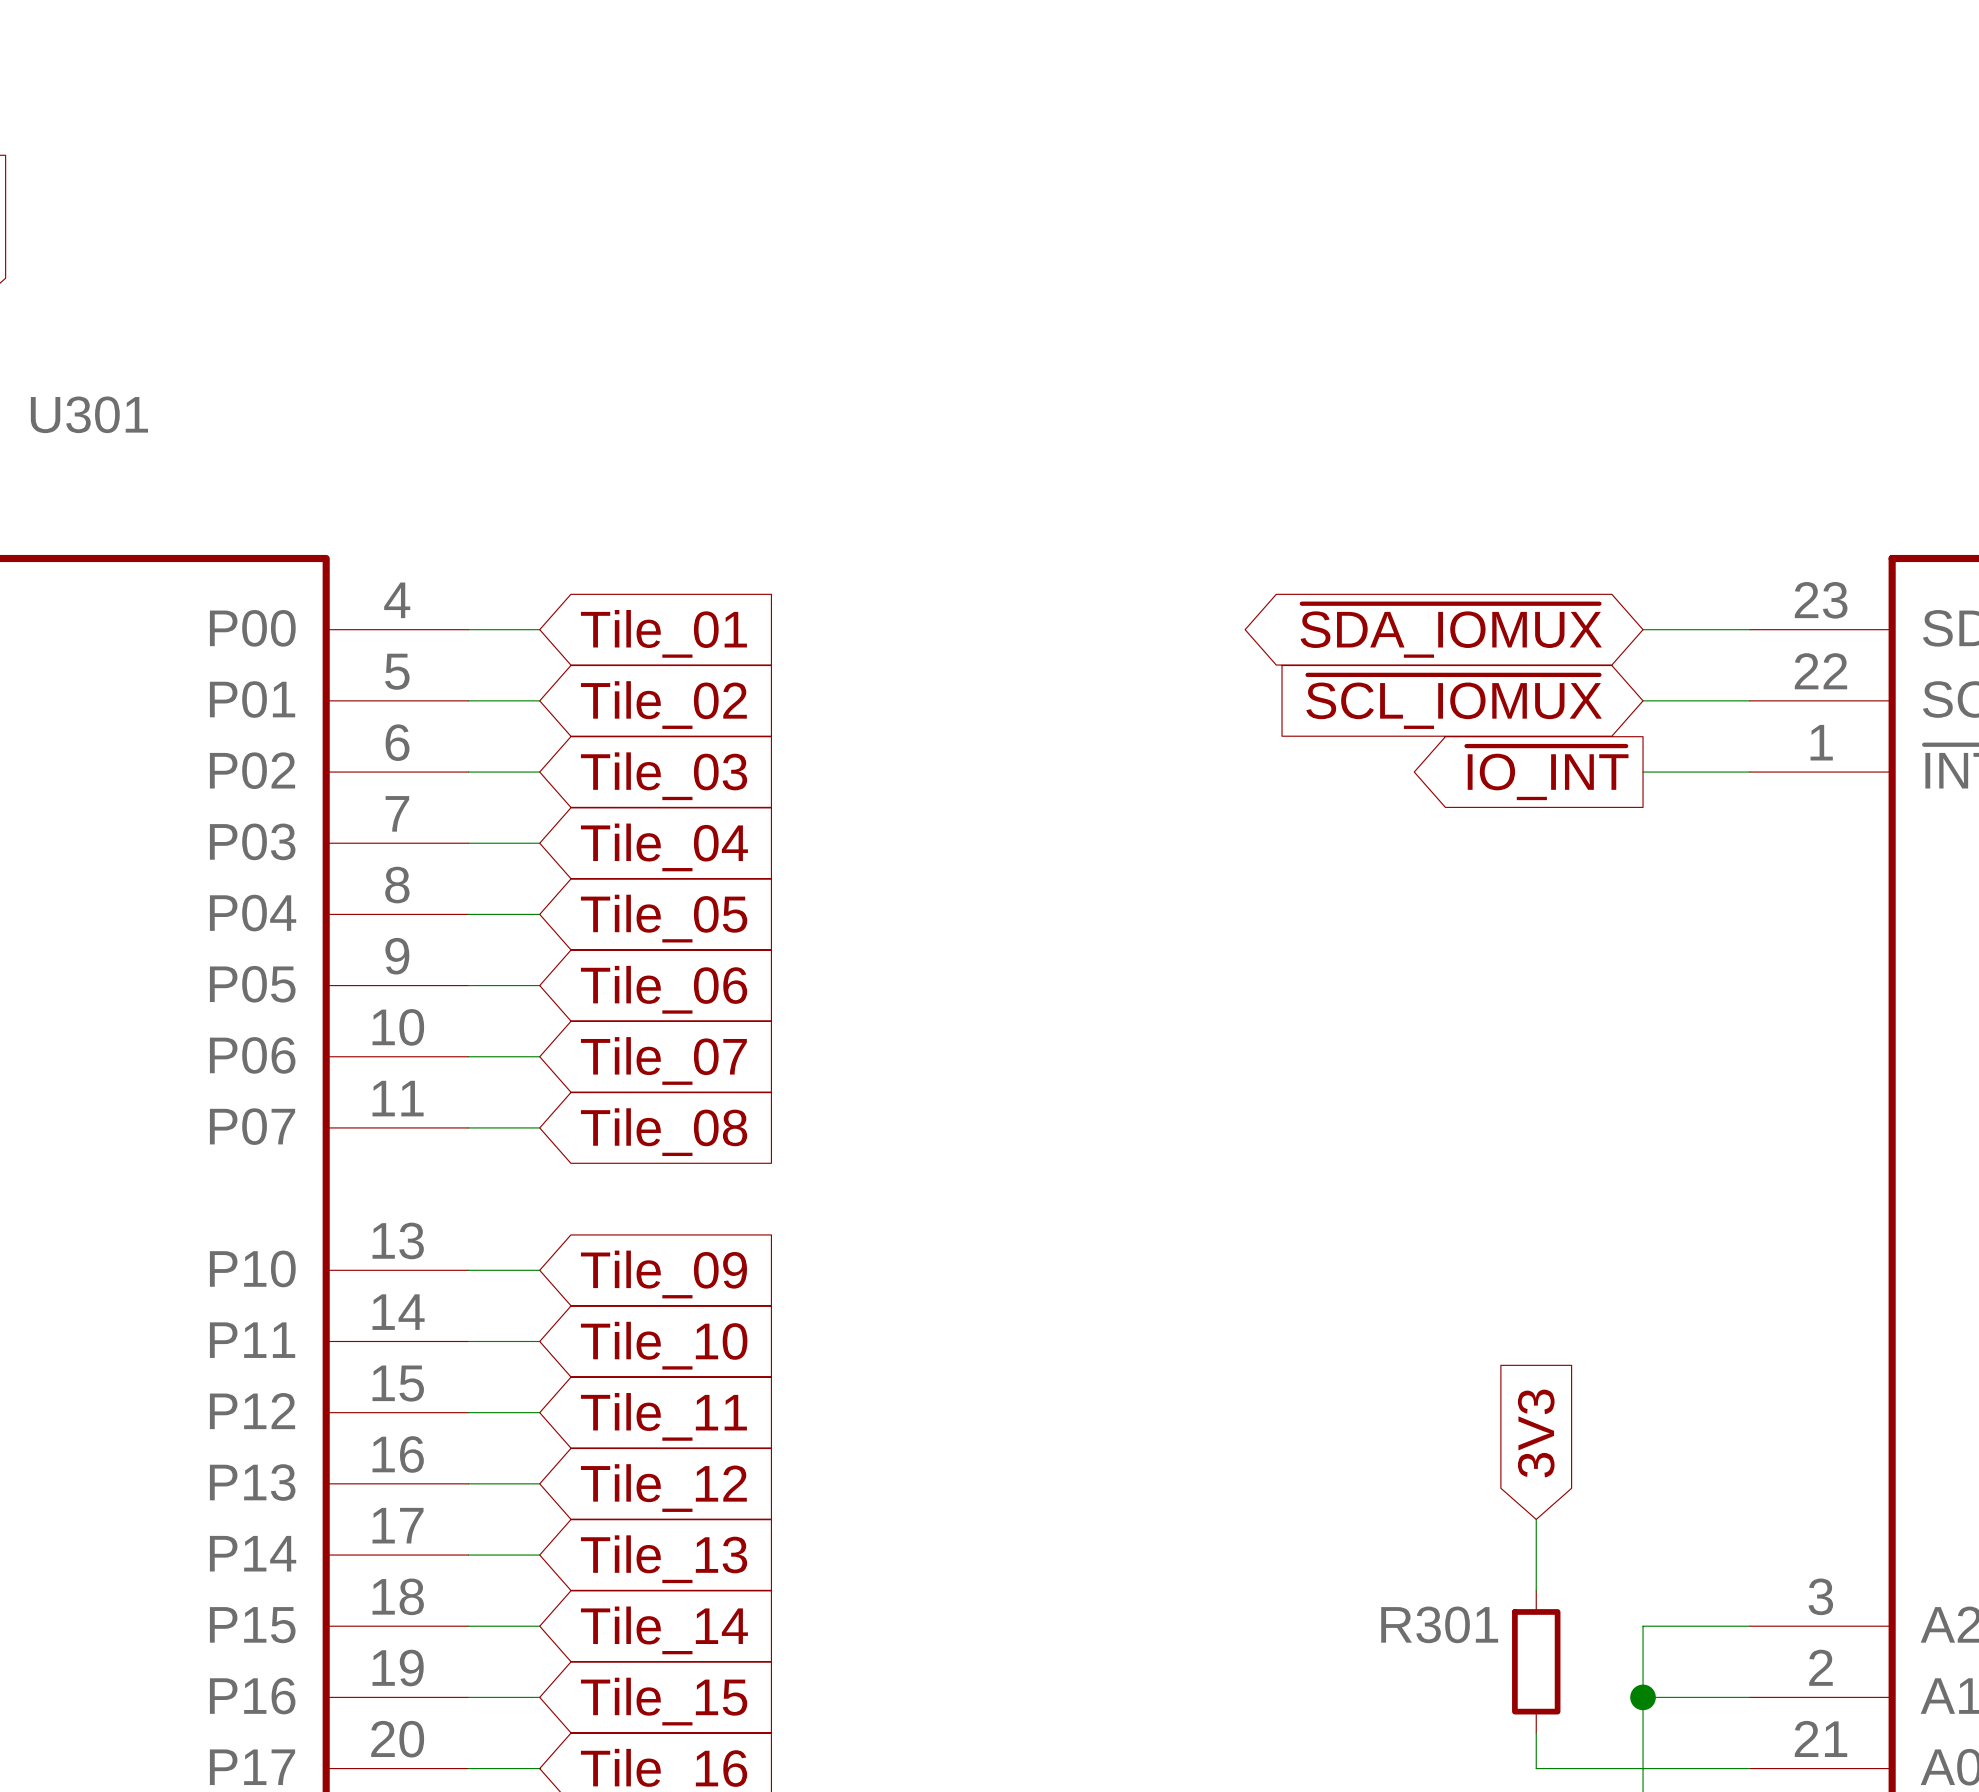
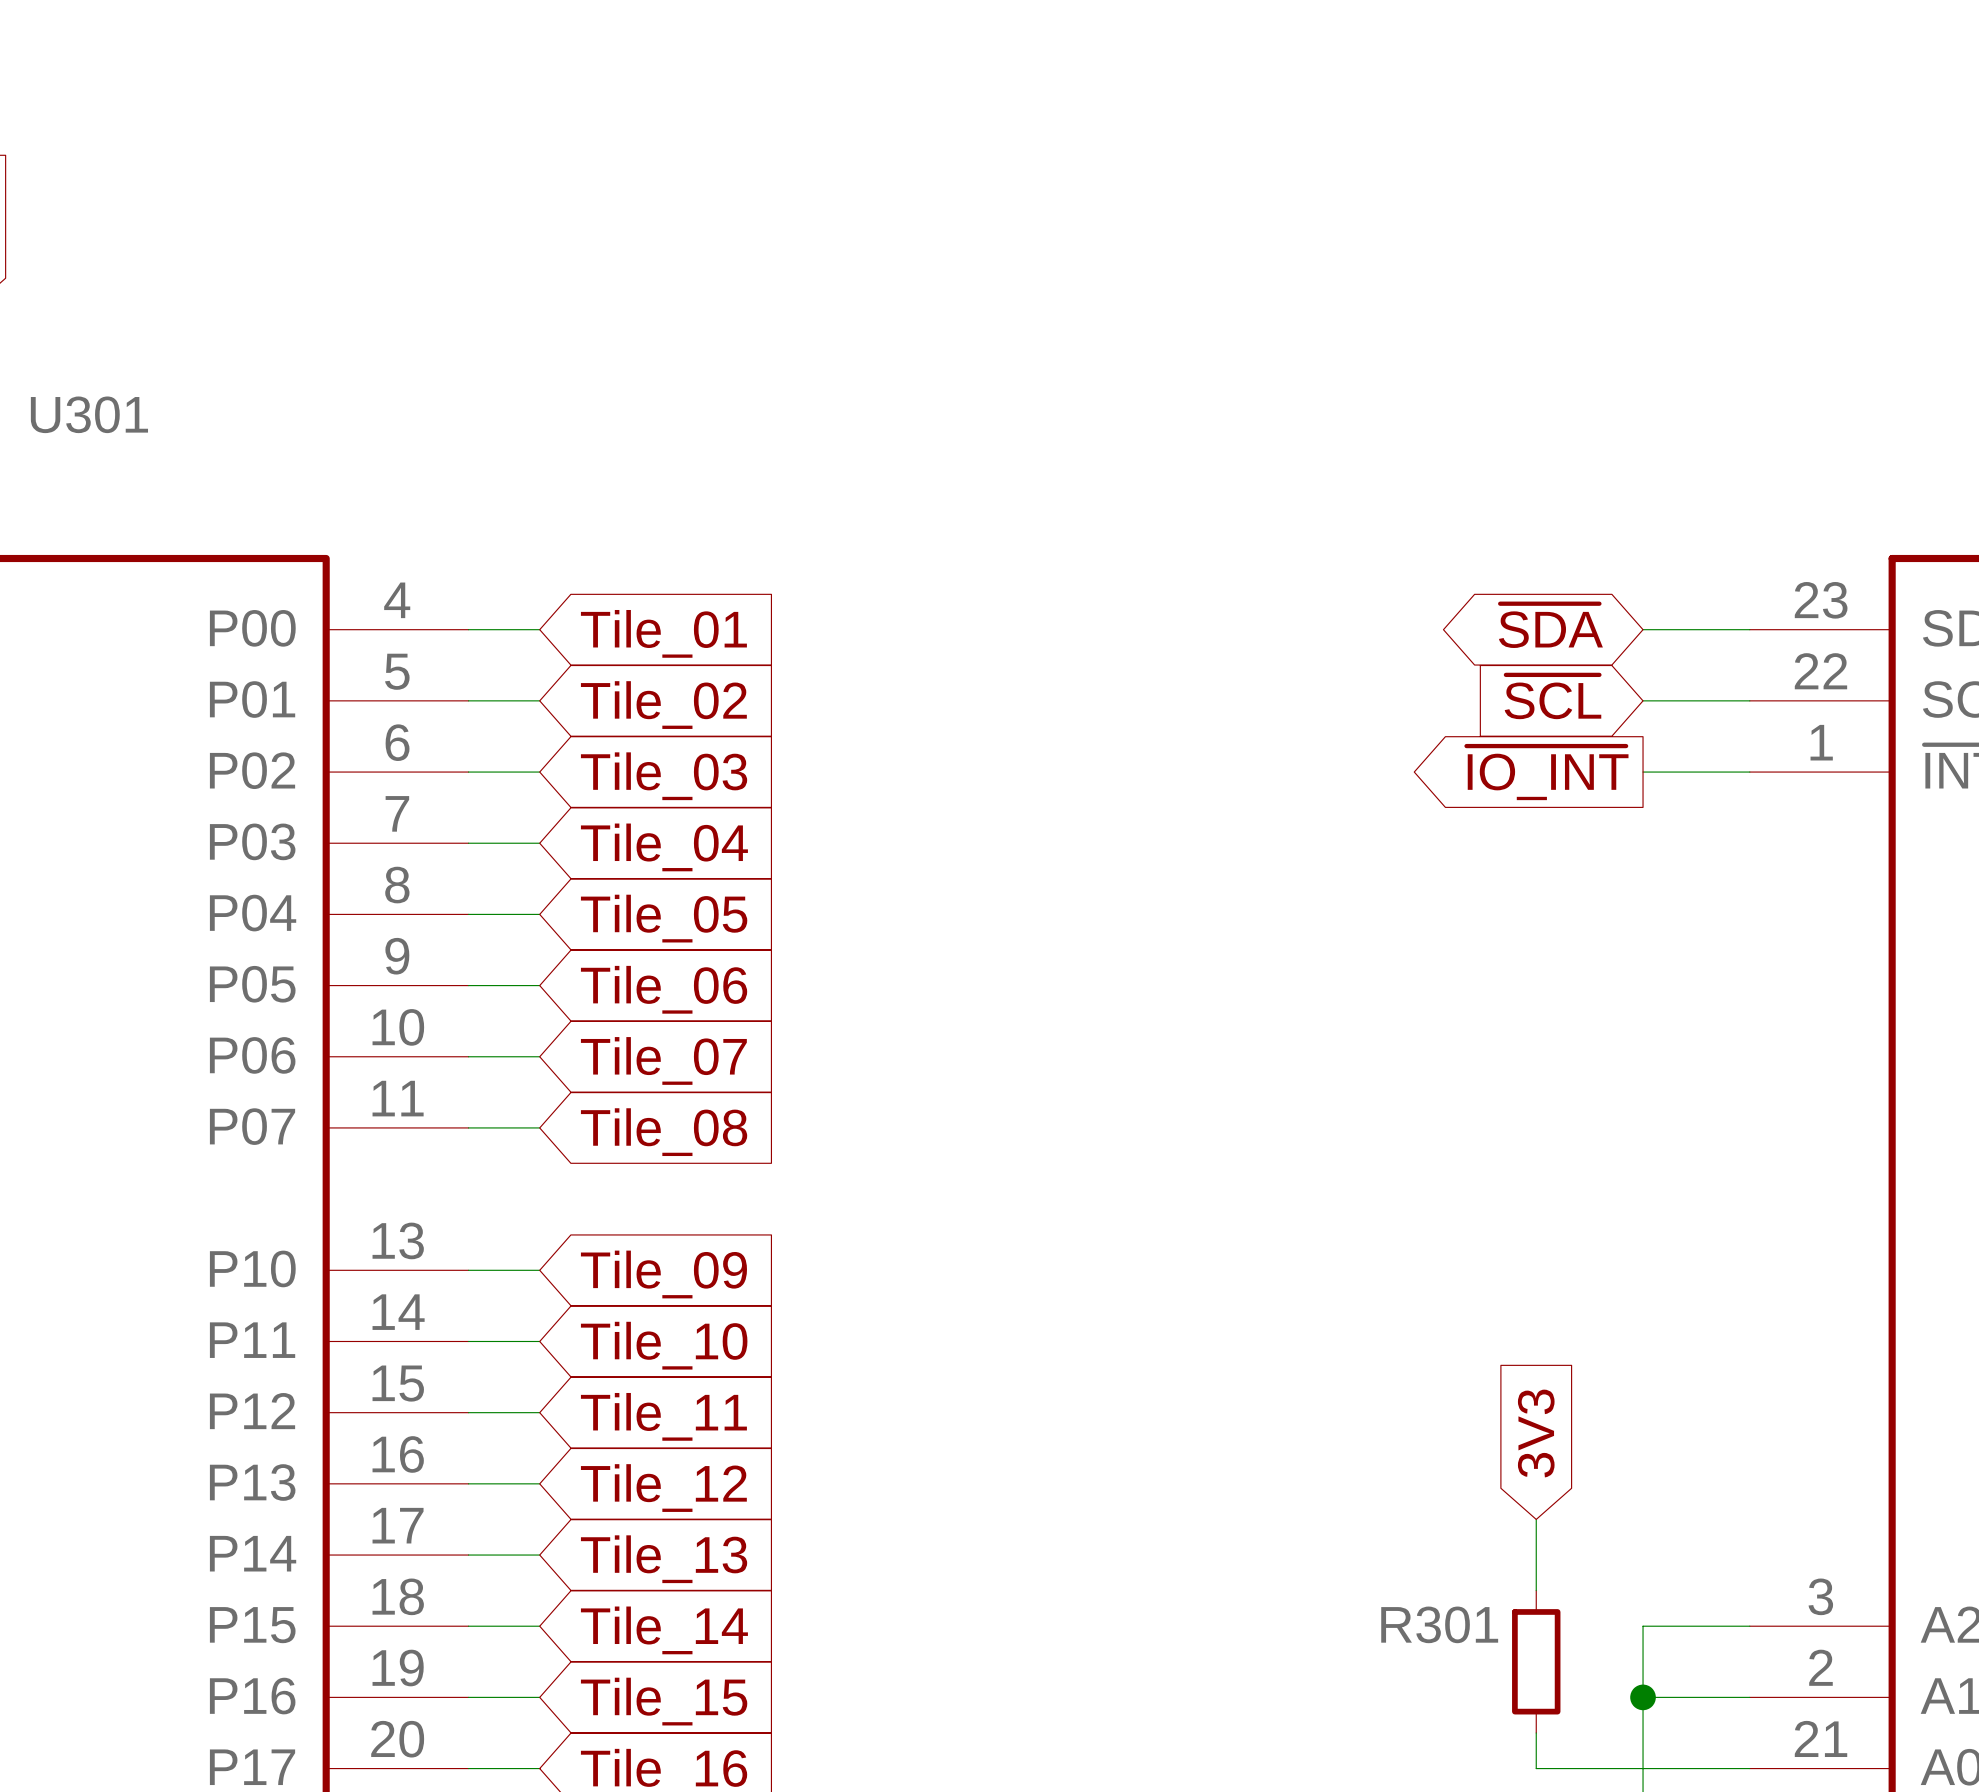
global label: ~{SDA_IOMUX} (1451, 630) -> ~{SDA} (1550, 625)
global label: ~{SCL_IOMUX} (1454, 701) -> ~{SCL} (1552, 697)

